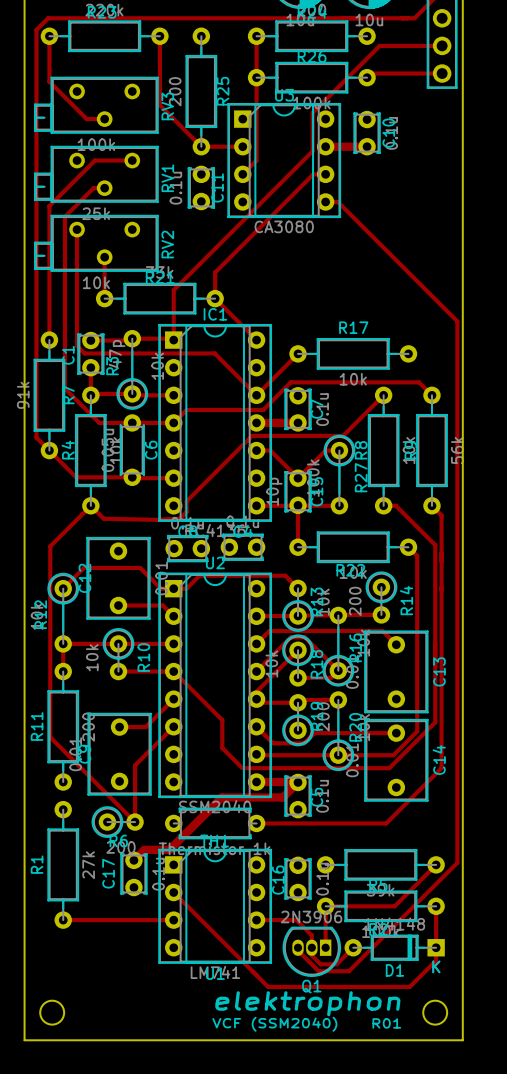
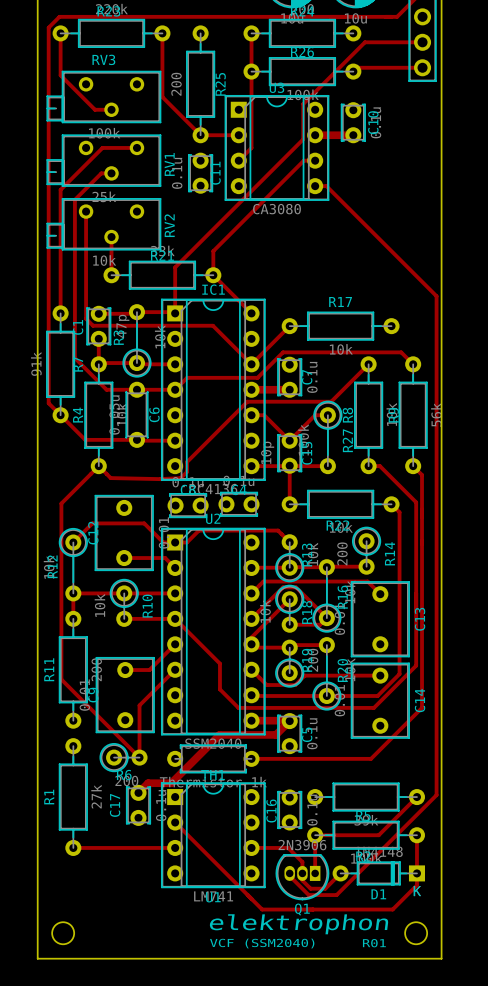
RV3 name rotation: 0° (167, 106) -> 90° clockwise (103, 59)
RV3 name position: RV3 (167, 106) -> RV3 (103, 59)

